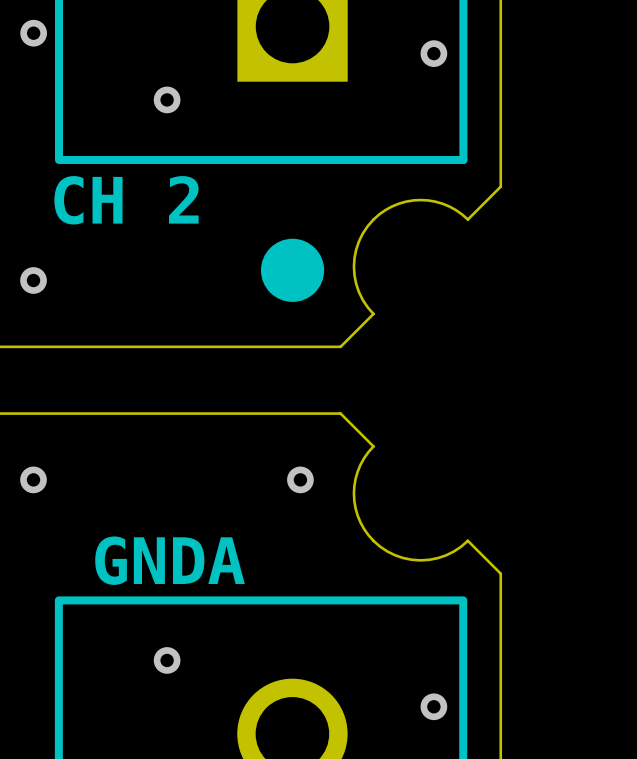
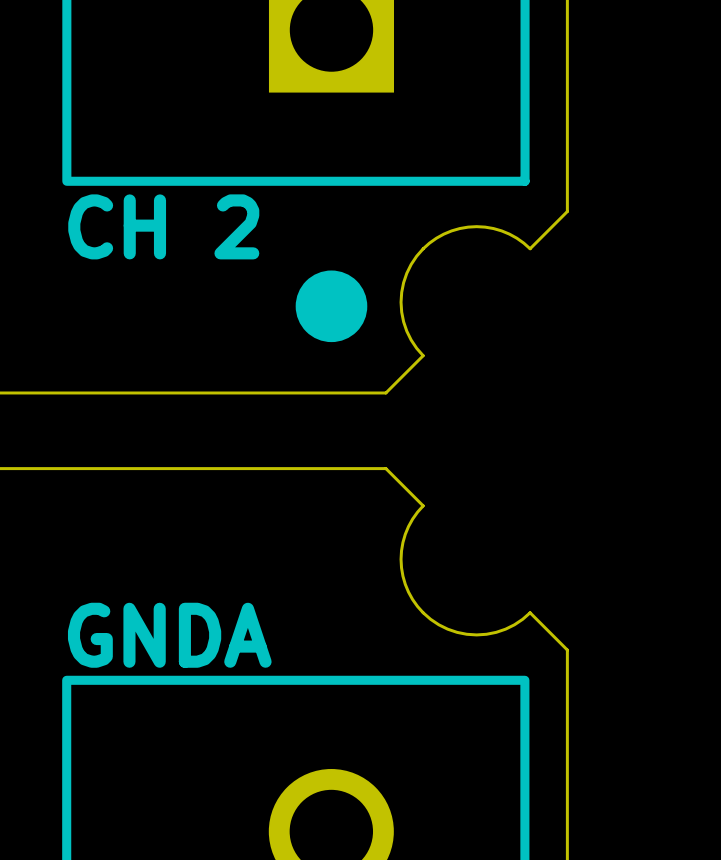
via: (33, 33) -> none
via: (433, 53) -> none
via: (167, 99) -> none
via: (33, 280) -> none
via: (33, 479) -> none
via: (300, 479) -> none
via: (167, 660) -> none
via: (433, 706) -> none

